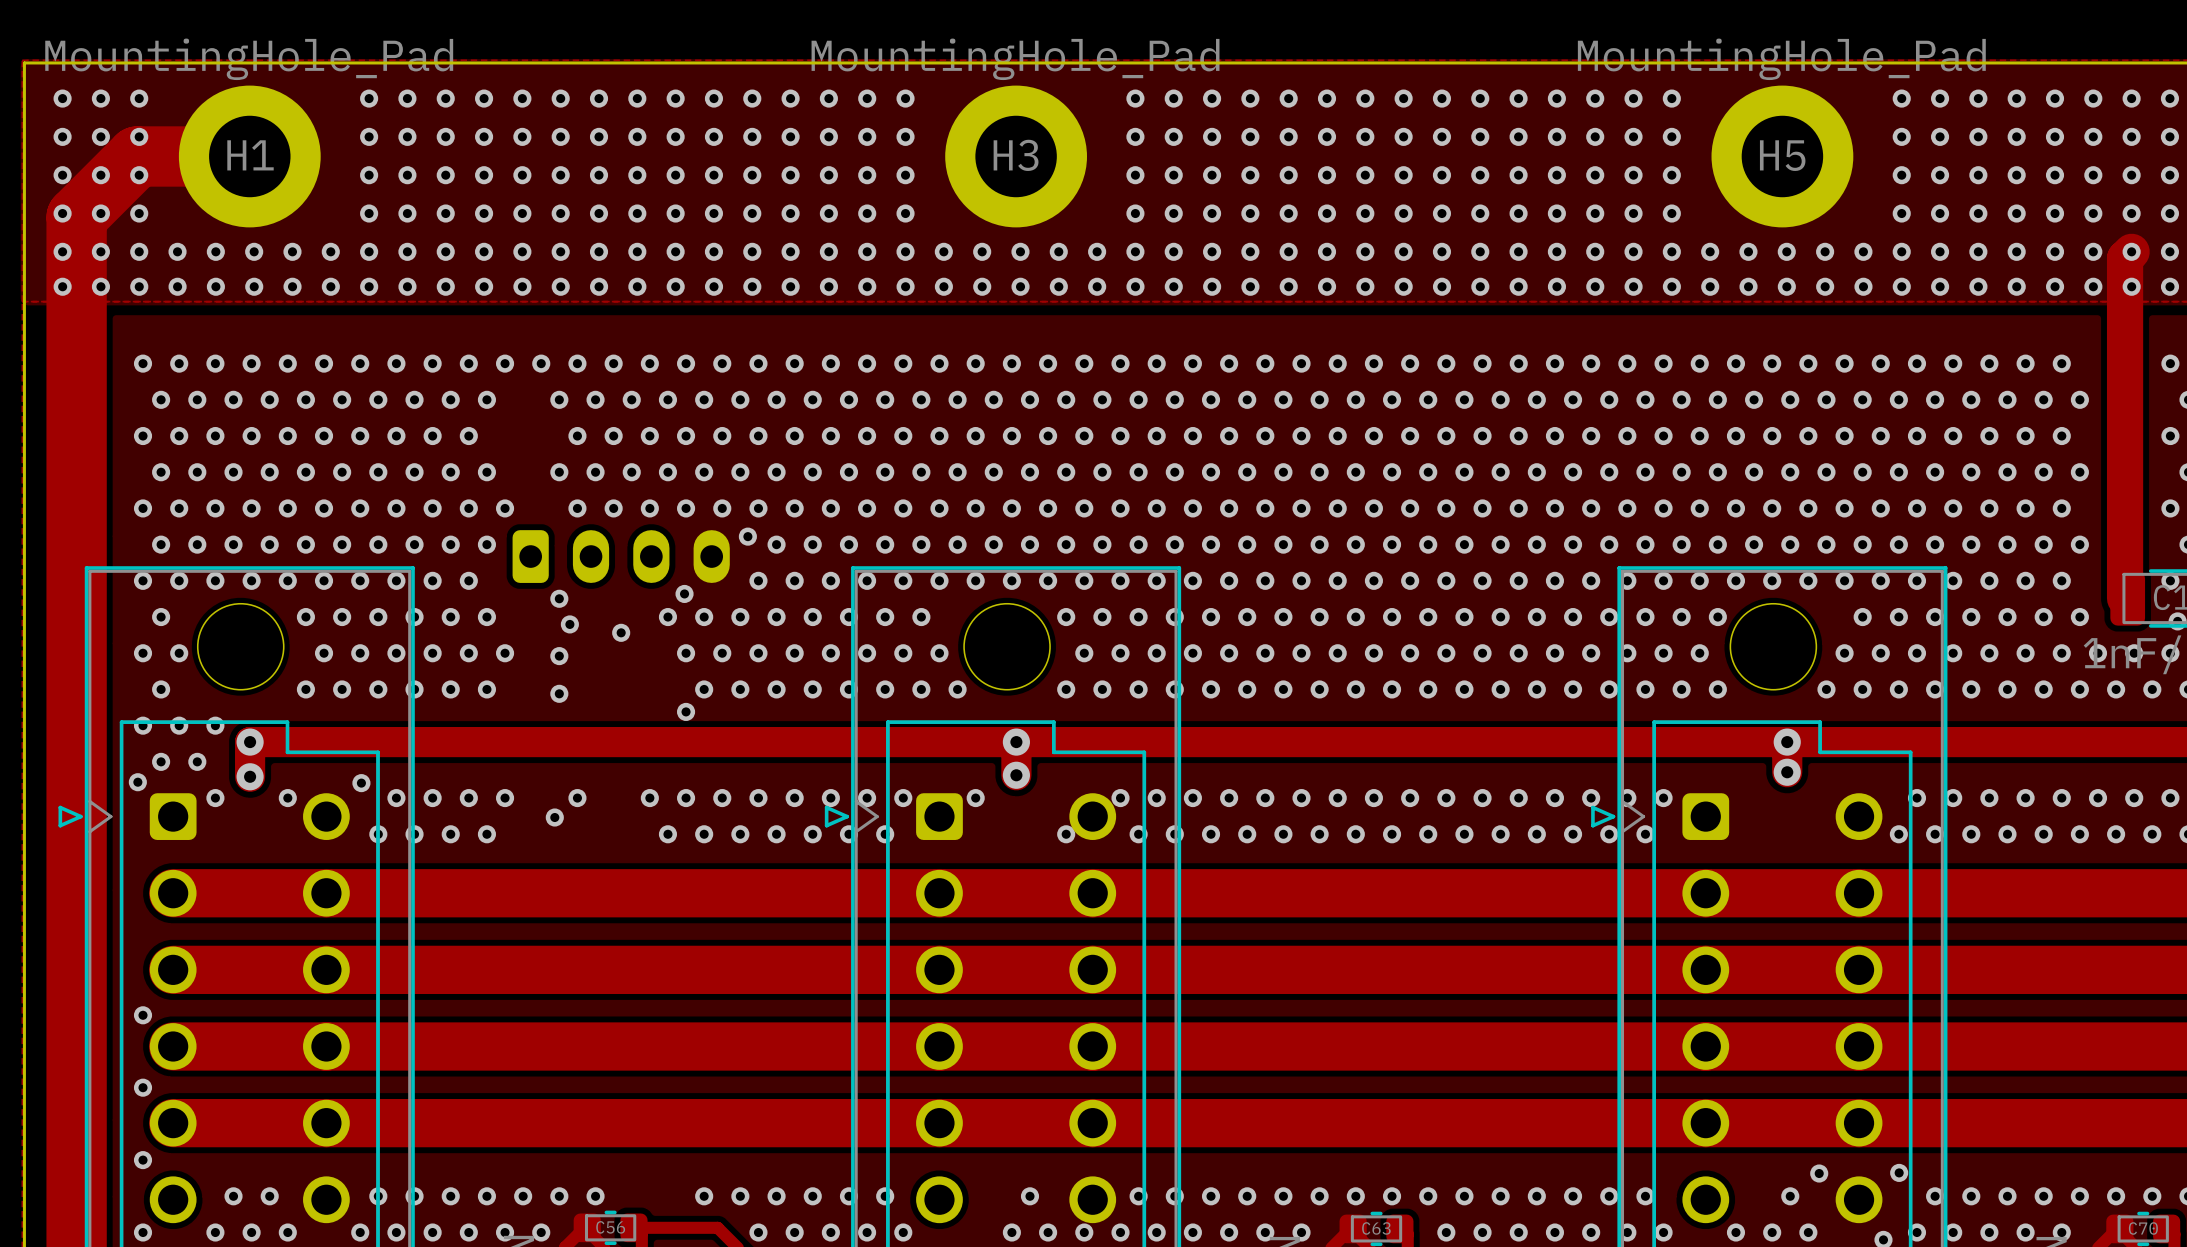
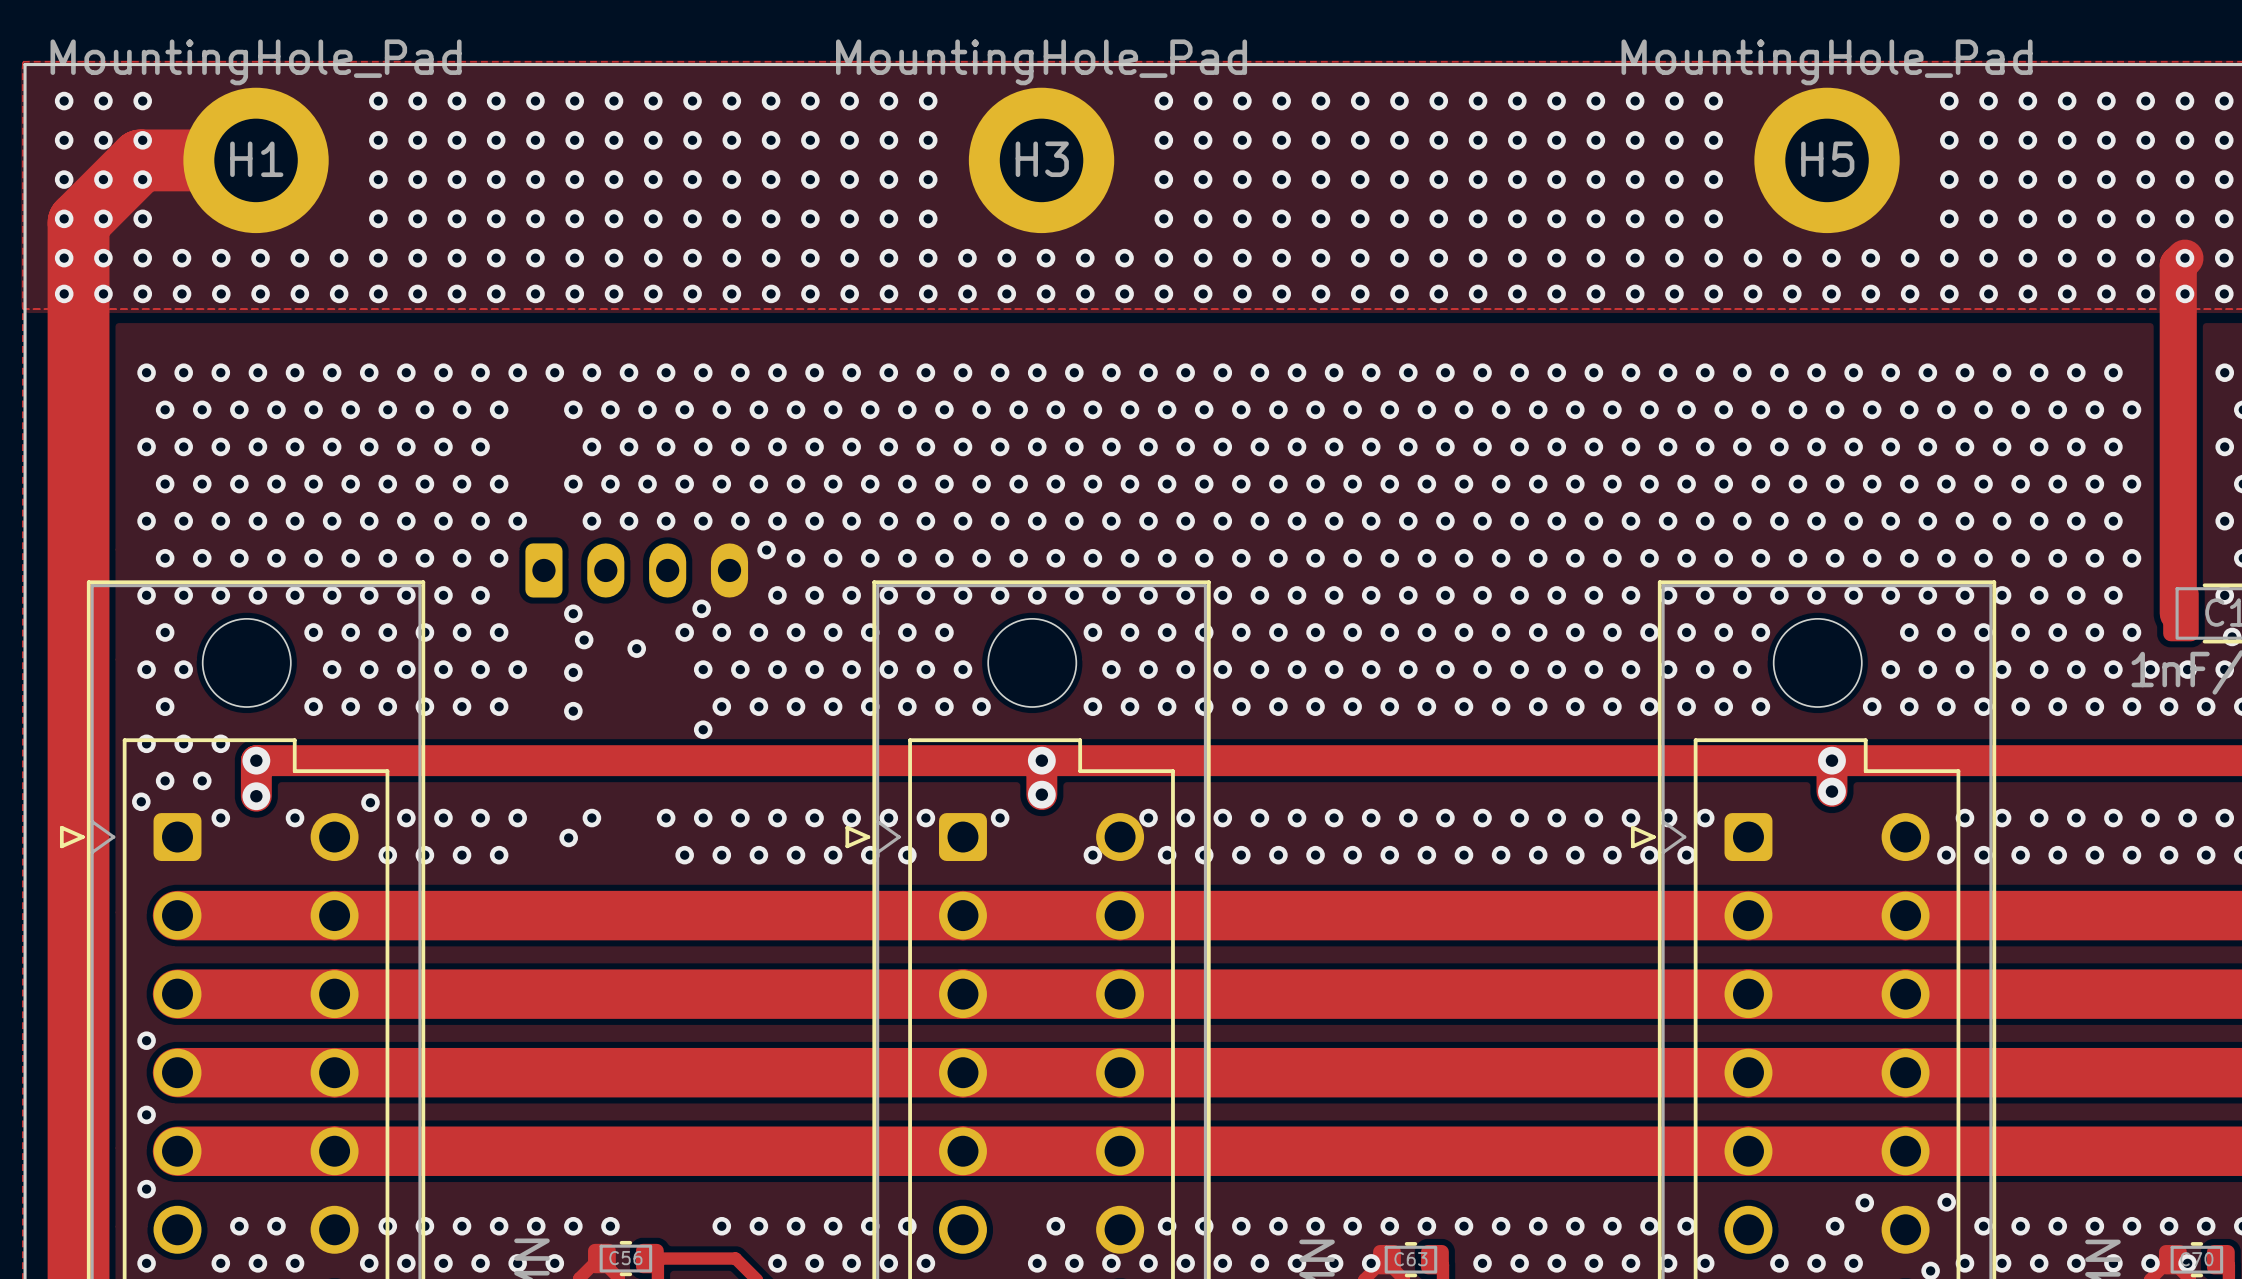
via: none -> (1371, 1263)
via: none -> (2150, 1263)
via: none -> (2187, 1263)

